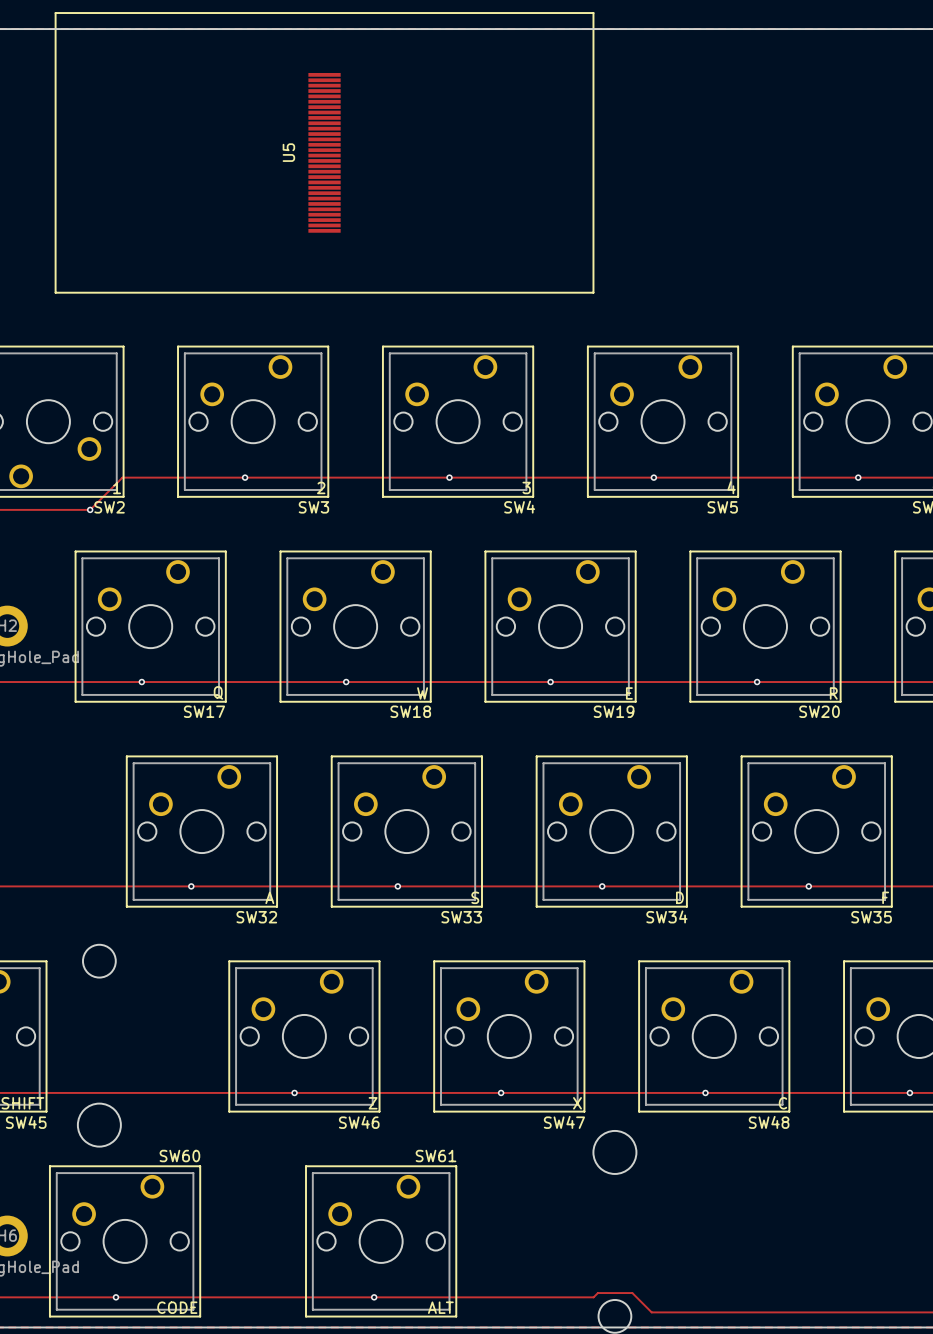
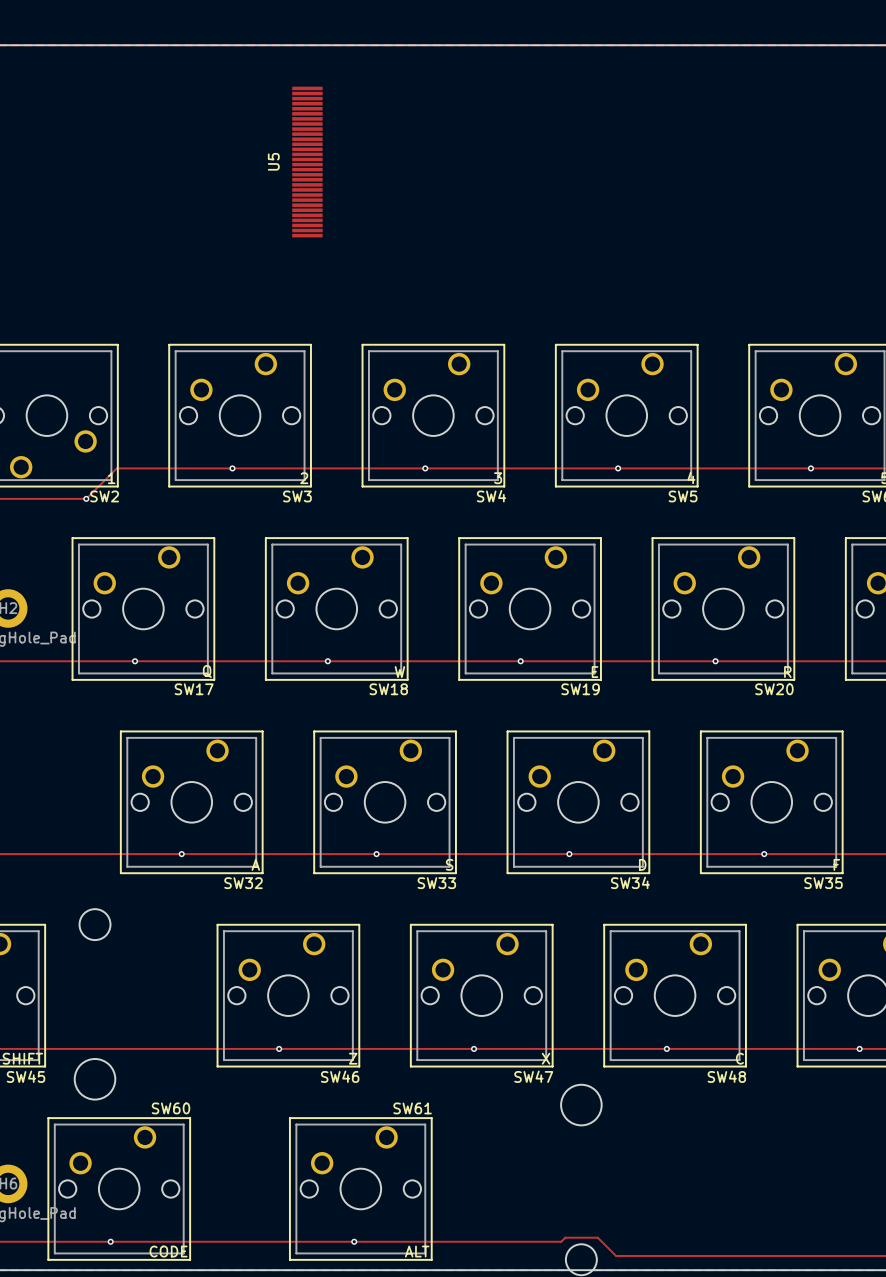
line: (55, 13) (593, 13) (593, 292) (55, 292) (55, 13) -> none

